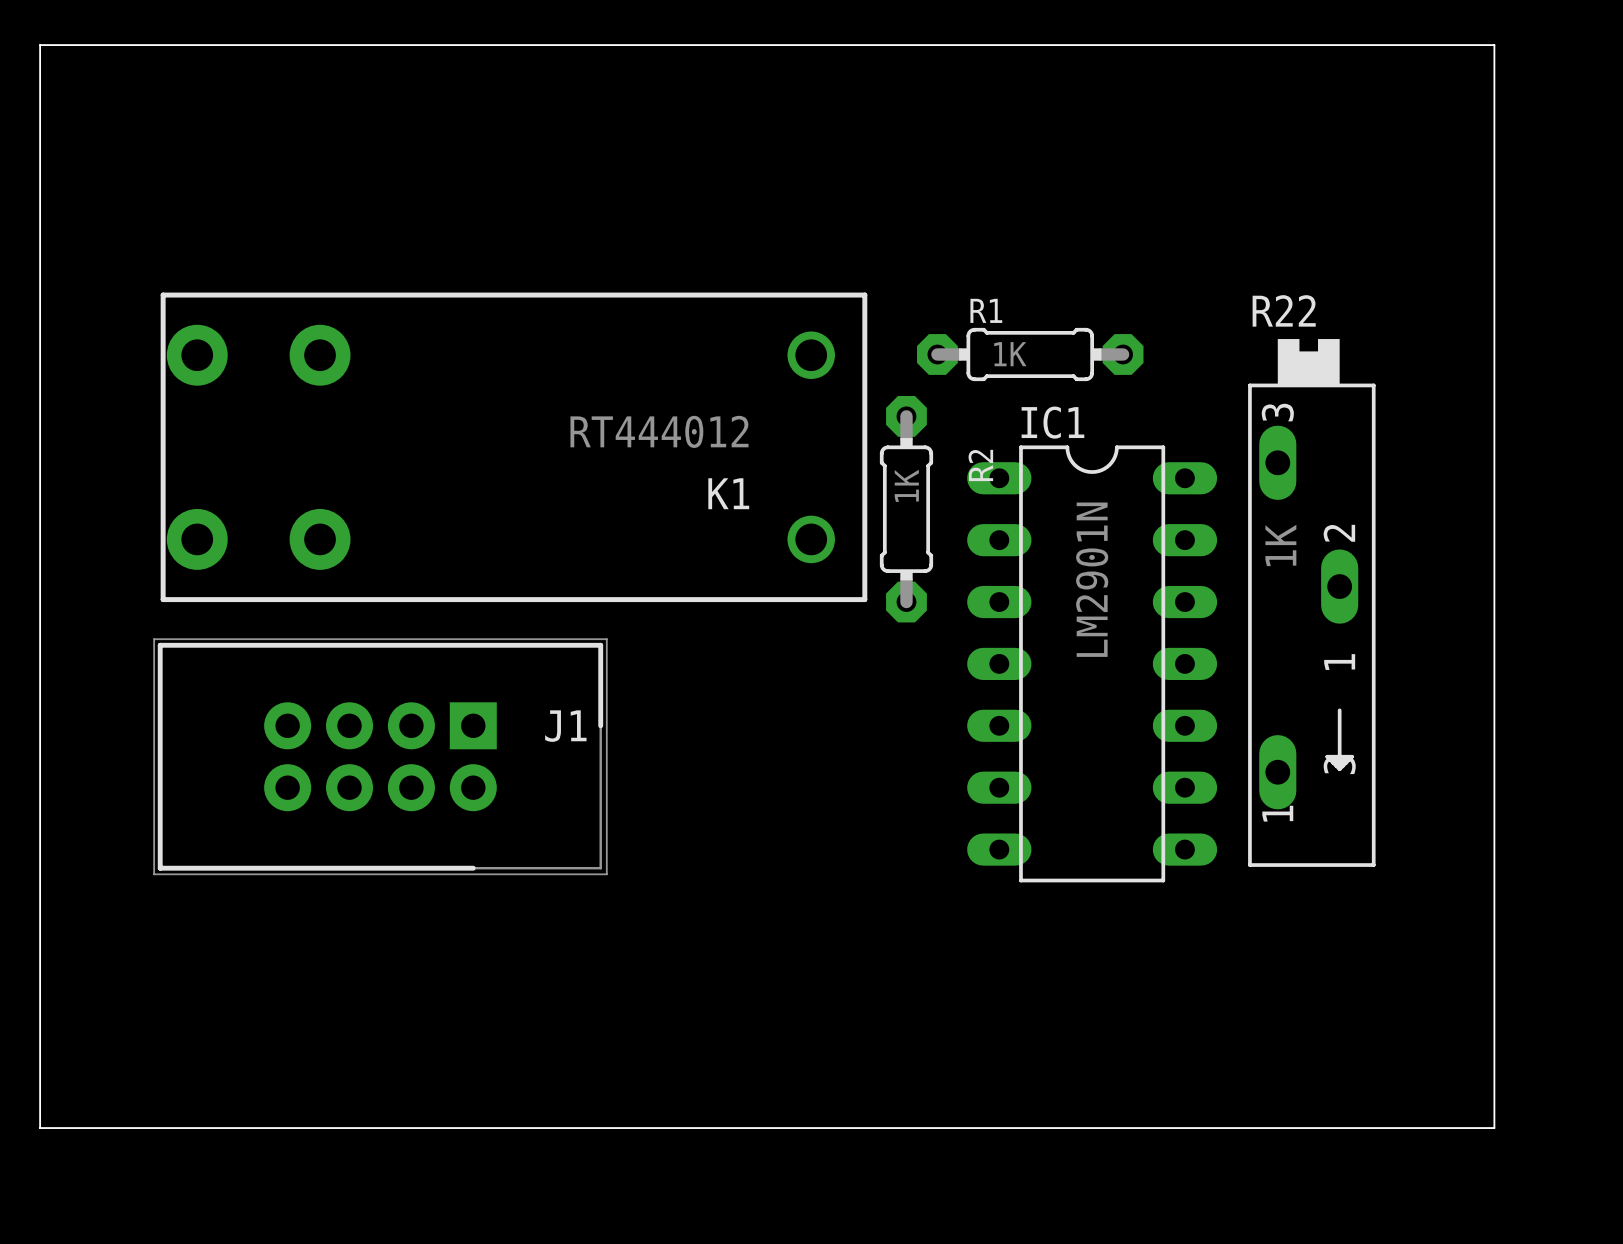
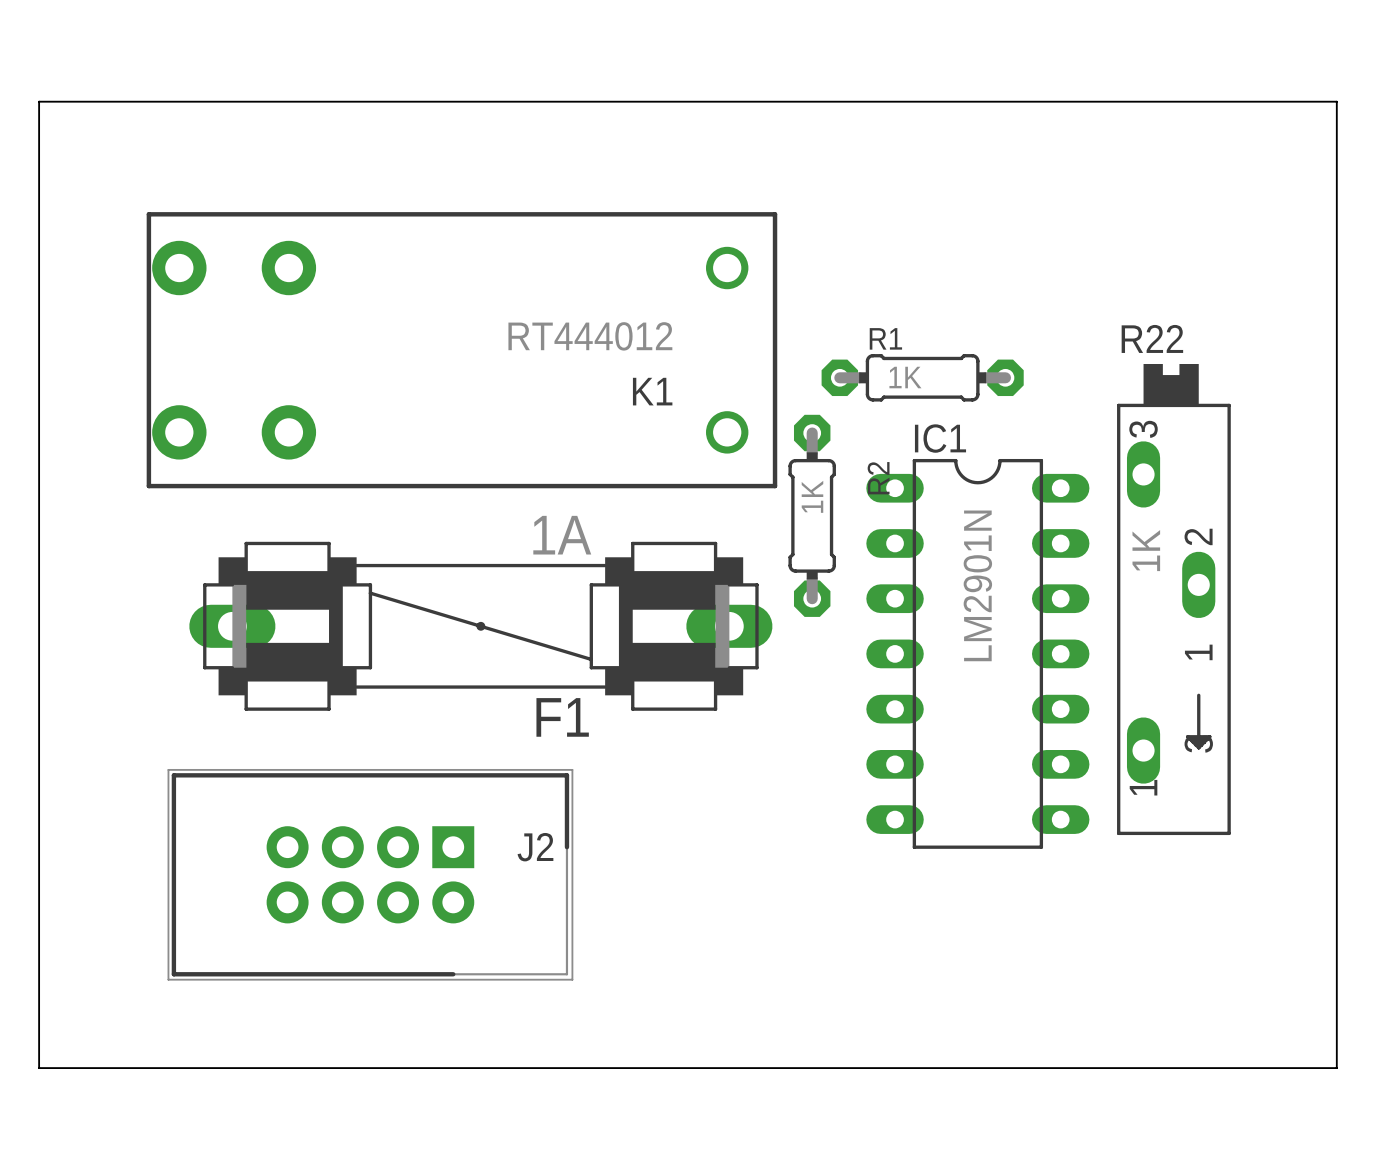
K1 position: (513, 447) -> (461, 350)
F1: none -> 1A (480, 626)
J1: (380, 756) -> none
J2: none -> (370, 874)

